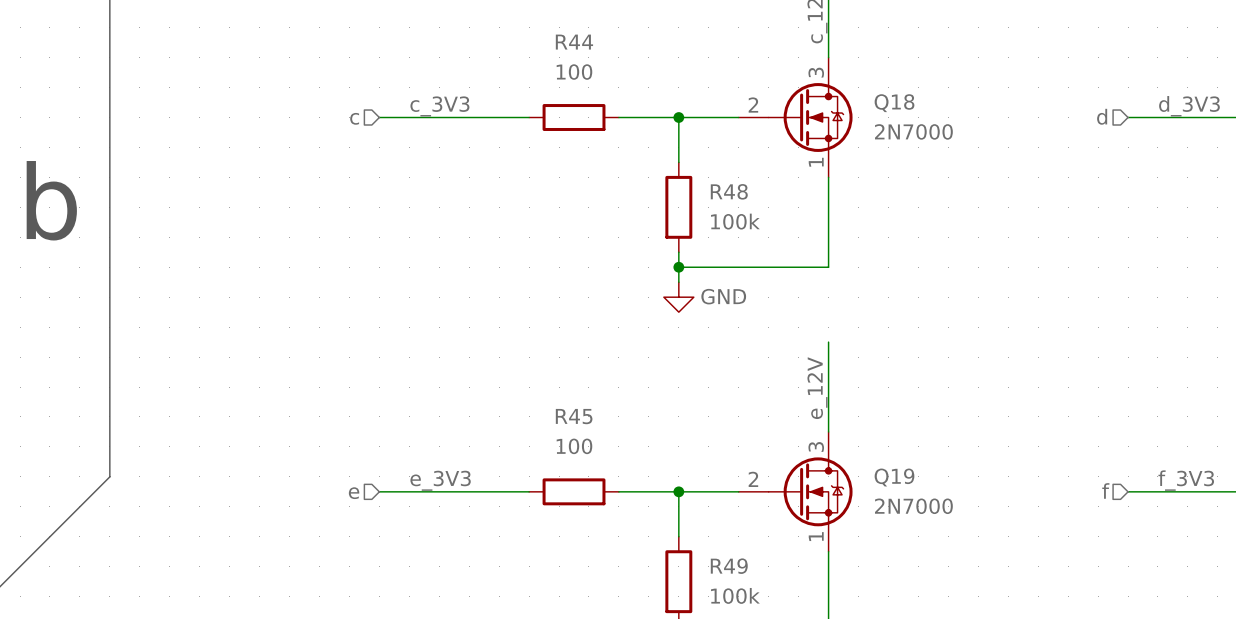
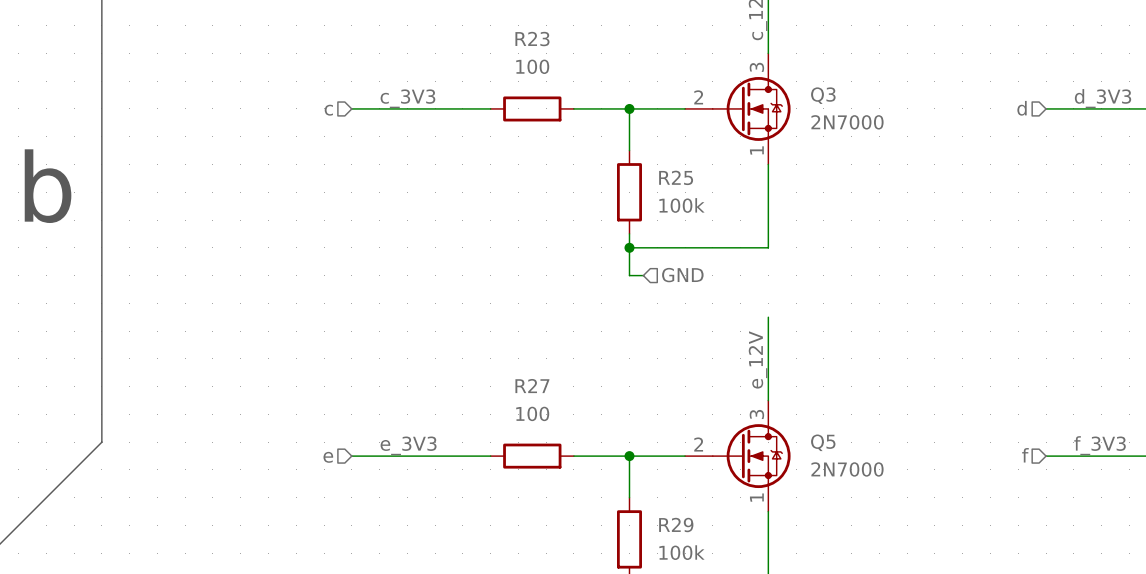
R44 name: R44 (574, 42) -> R23 (532, 39)
Q18 name: Q18 (894, 103) -> Q3 (823, 95)
R48 name: R48 (729, 191) -> R25 (676, 177)
hierarchical label: none -> GND (682, 275)
power symbol: GND (678, 297) -> none
R45 name: R45 (574, 416) -> R27 (532, 386)
Q19 name: Q19 (894, 477) -> Q5 (823, 442)
R49 name: R49 (729, 566) -> R29 (676, 525)

